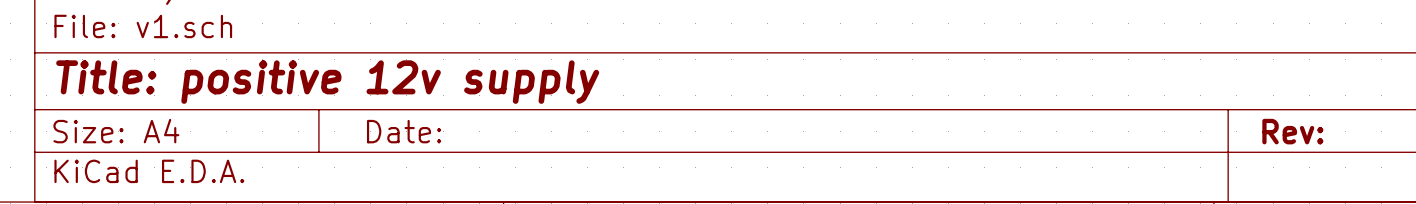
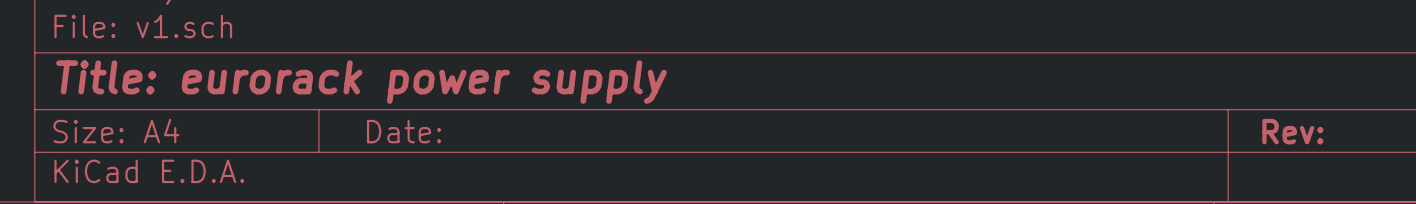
title block: Title: positive 12v supply (327, 82) -> Title: eurorack power supply (361, 82)

